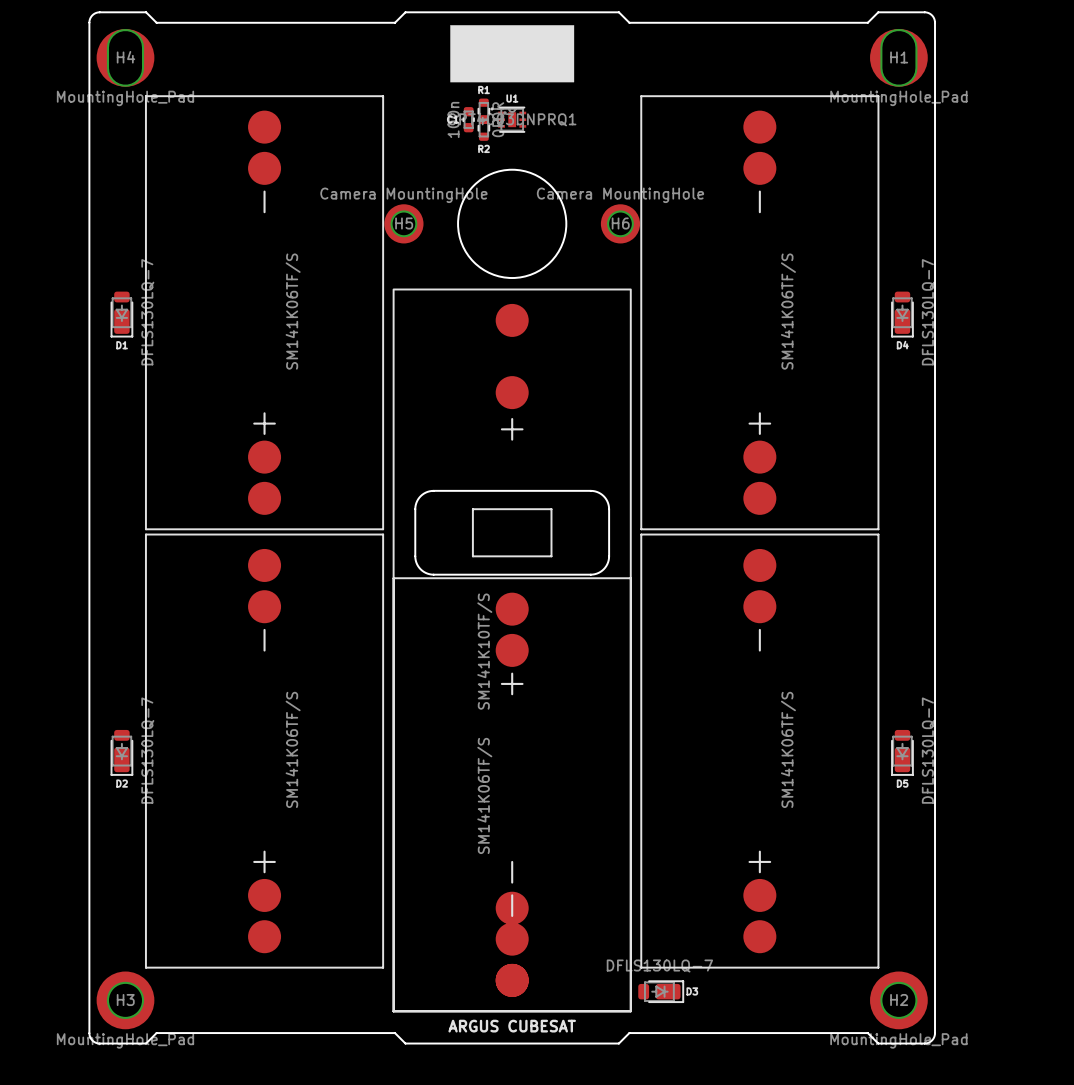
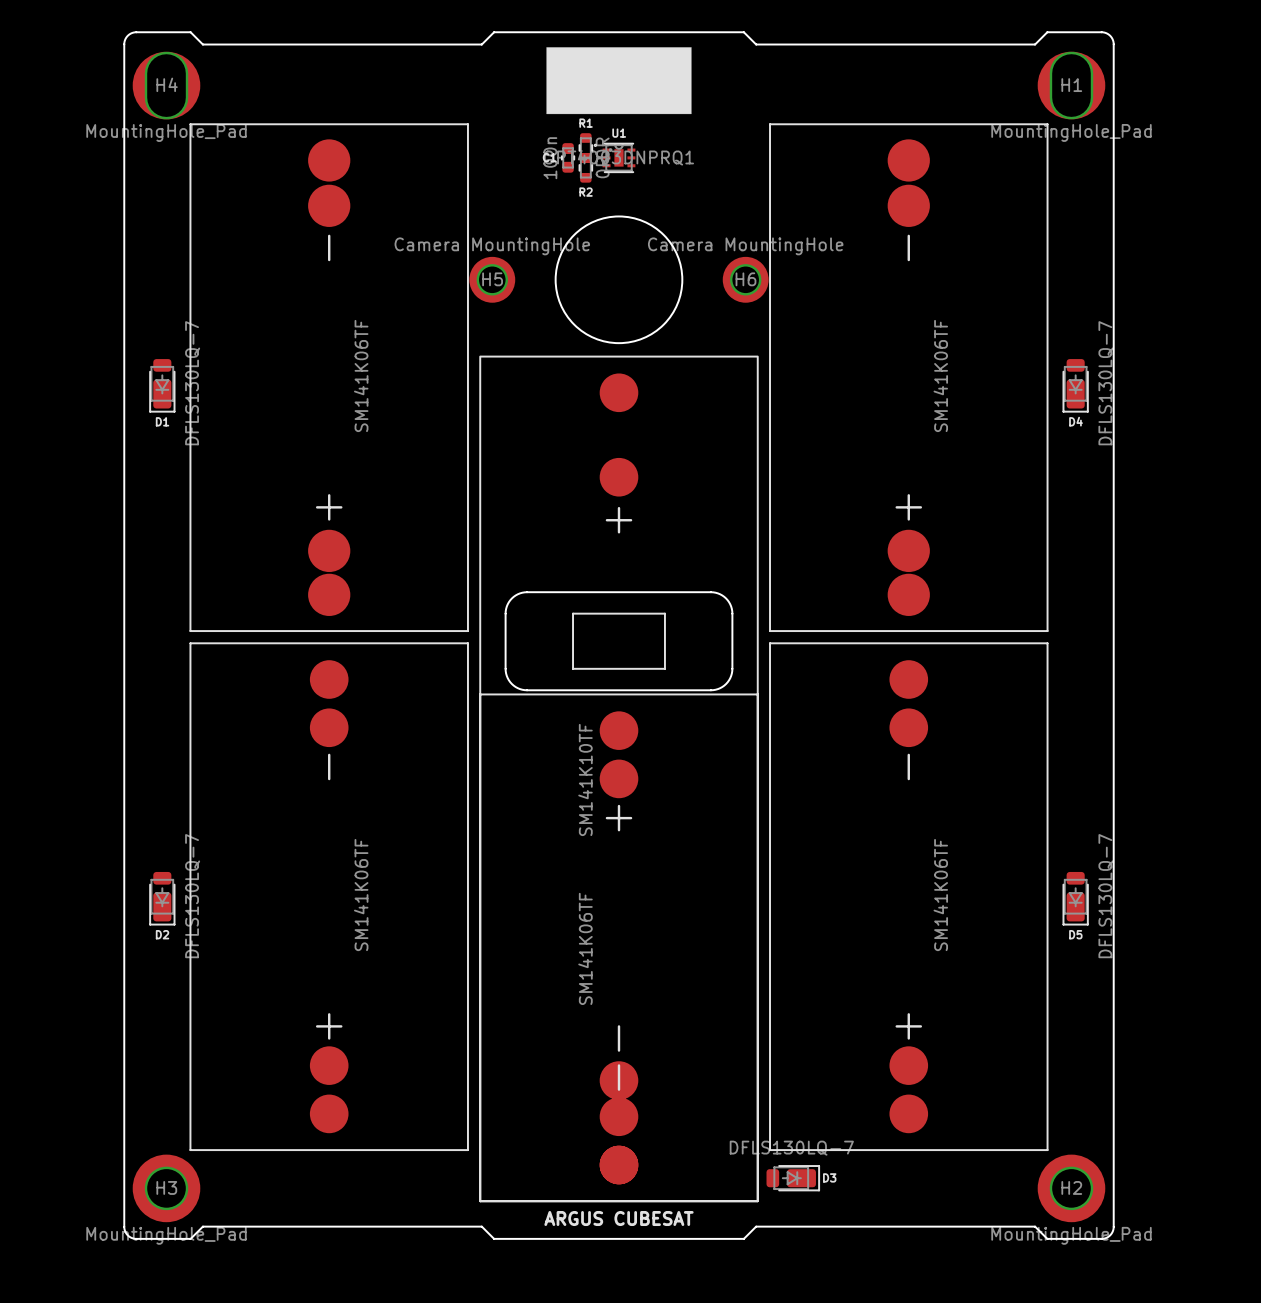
part footprint: [145, 95, 384, 530] -> [189, 123, 469, 632]
part footprint: [640, 95, 879, 530] -> [769, 123, 1049, 632]
part value: SM141K06TF/S (293, 311) -> SM141K06TF (361, 376)
part value: SM141K06TF/S (788, 311) -> SM141K06TF (940, 376)
part value: SM141K10TF/S (484, 651) -> SM141K10TF (585, 779)
part value: SM141K06TF/S (293, 749) -> SM141K06TF (361, 895)
part value: SM141K06TF/S (788, 749) -> SM141K06TF (940, 895)
part value: SM141K06TF/S (484, 795) -> SM141K06TF (585, 948)

